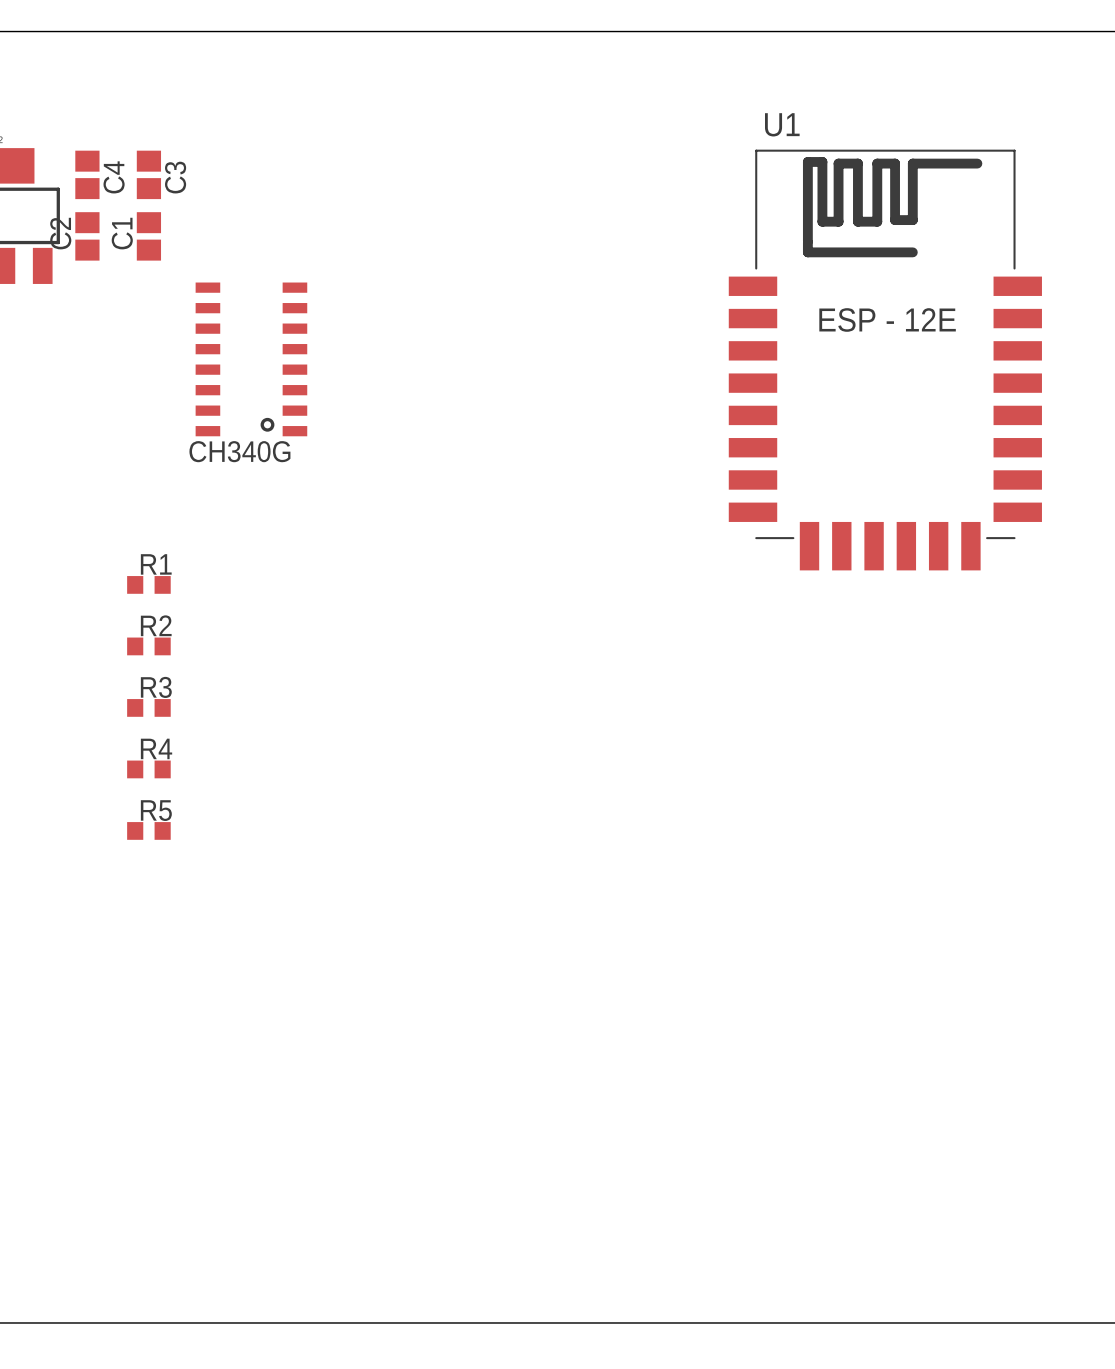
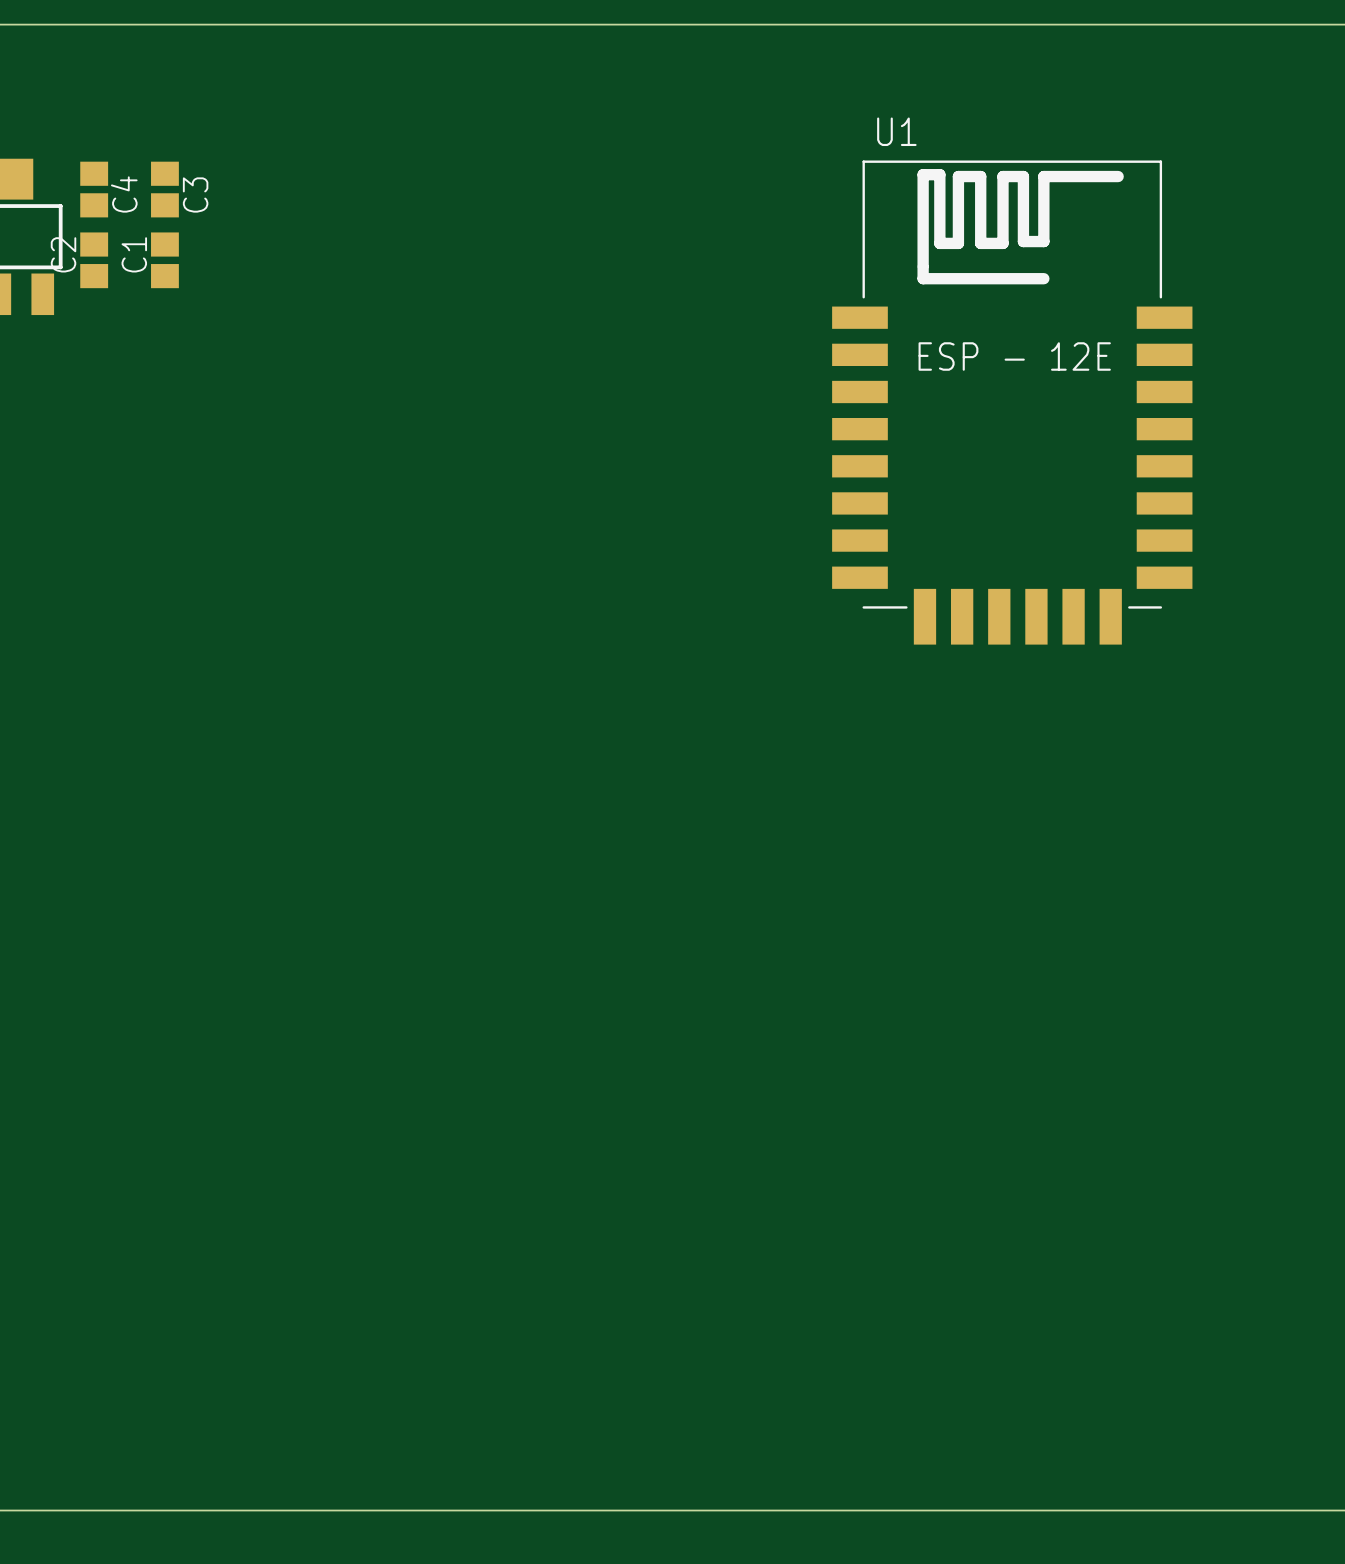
part: (251, 359) -> none
R1: (148, 584) -> none
R2: (148, 646) -> none
R3: (148, 707) -> none
R4: (148, 769) -> none
R5: (148, 830) -> none

